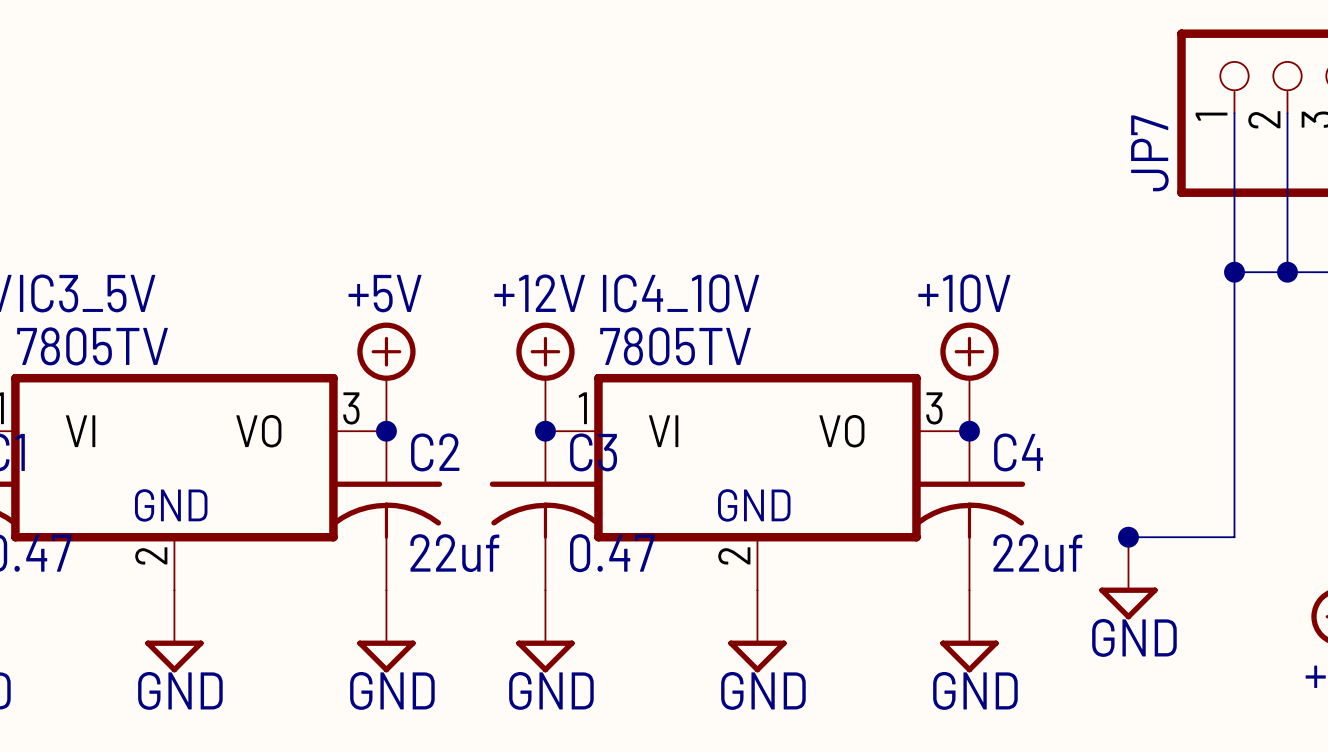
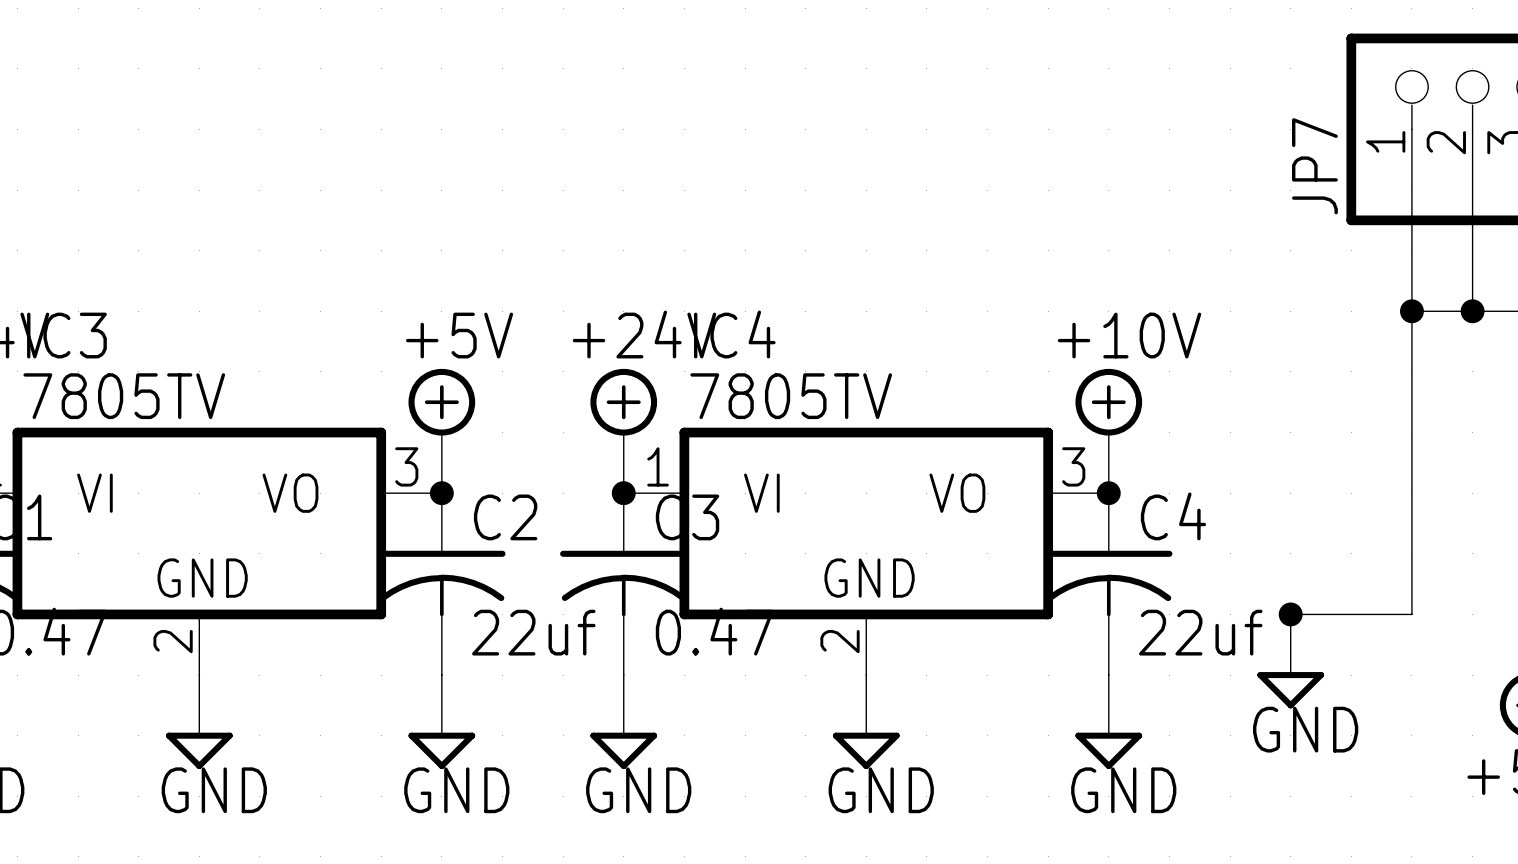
IC3_5V name: IC3_5V (87, 293) -> IC3 (66, 335)
IC4_10V name: IC4_10V (681, 293) -> IC4 (734, 334)
power symbol: +12V (545, 376) -> +24V (623, 431)

